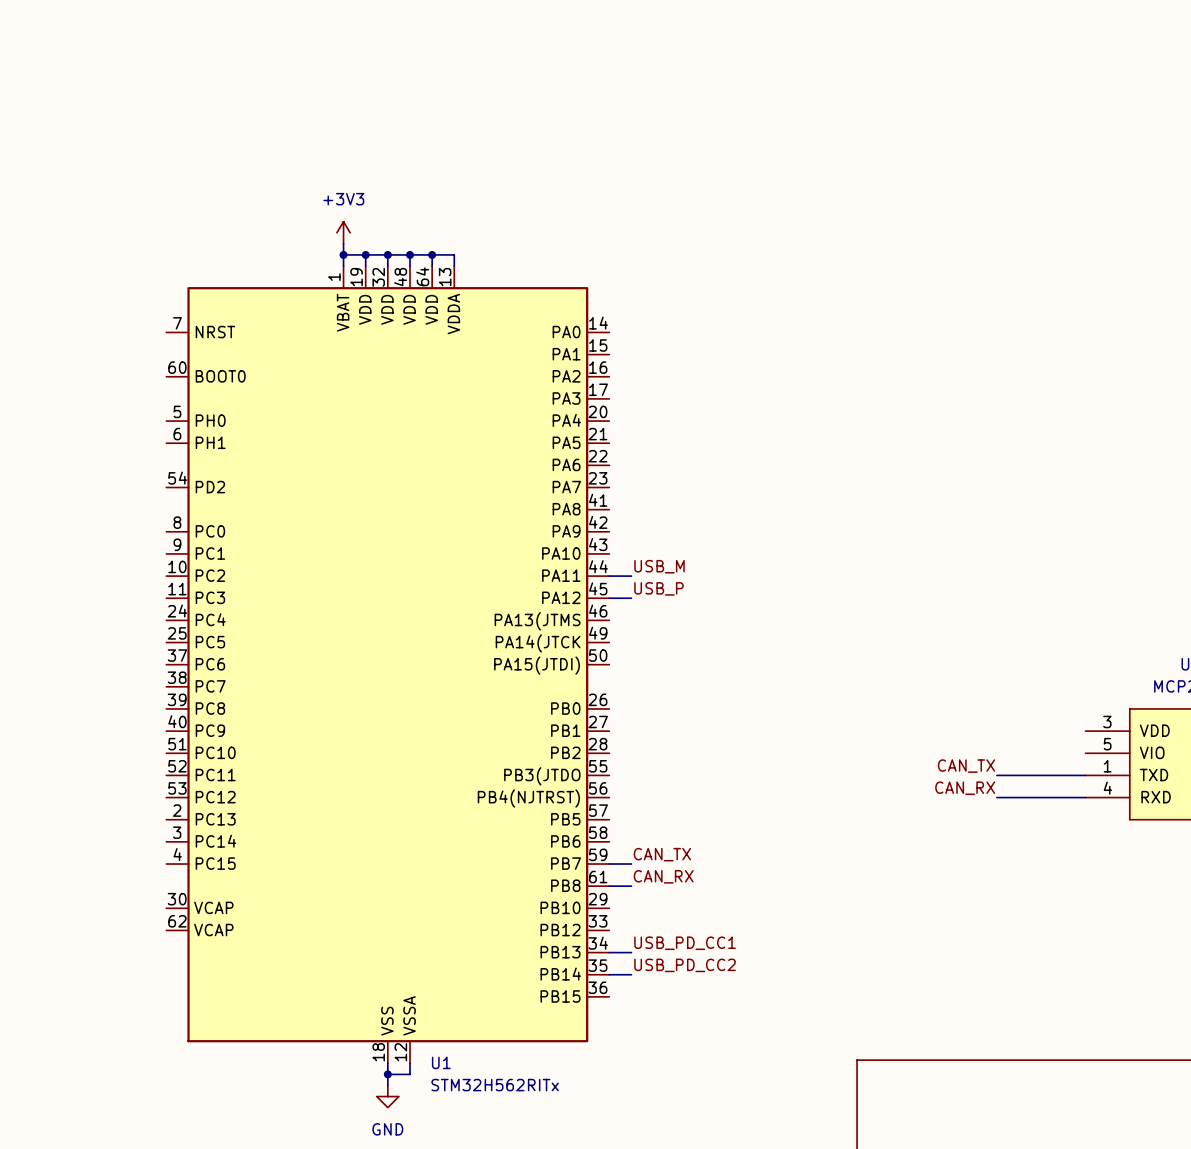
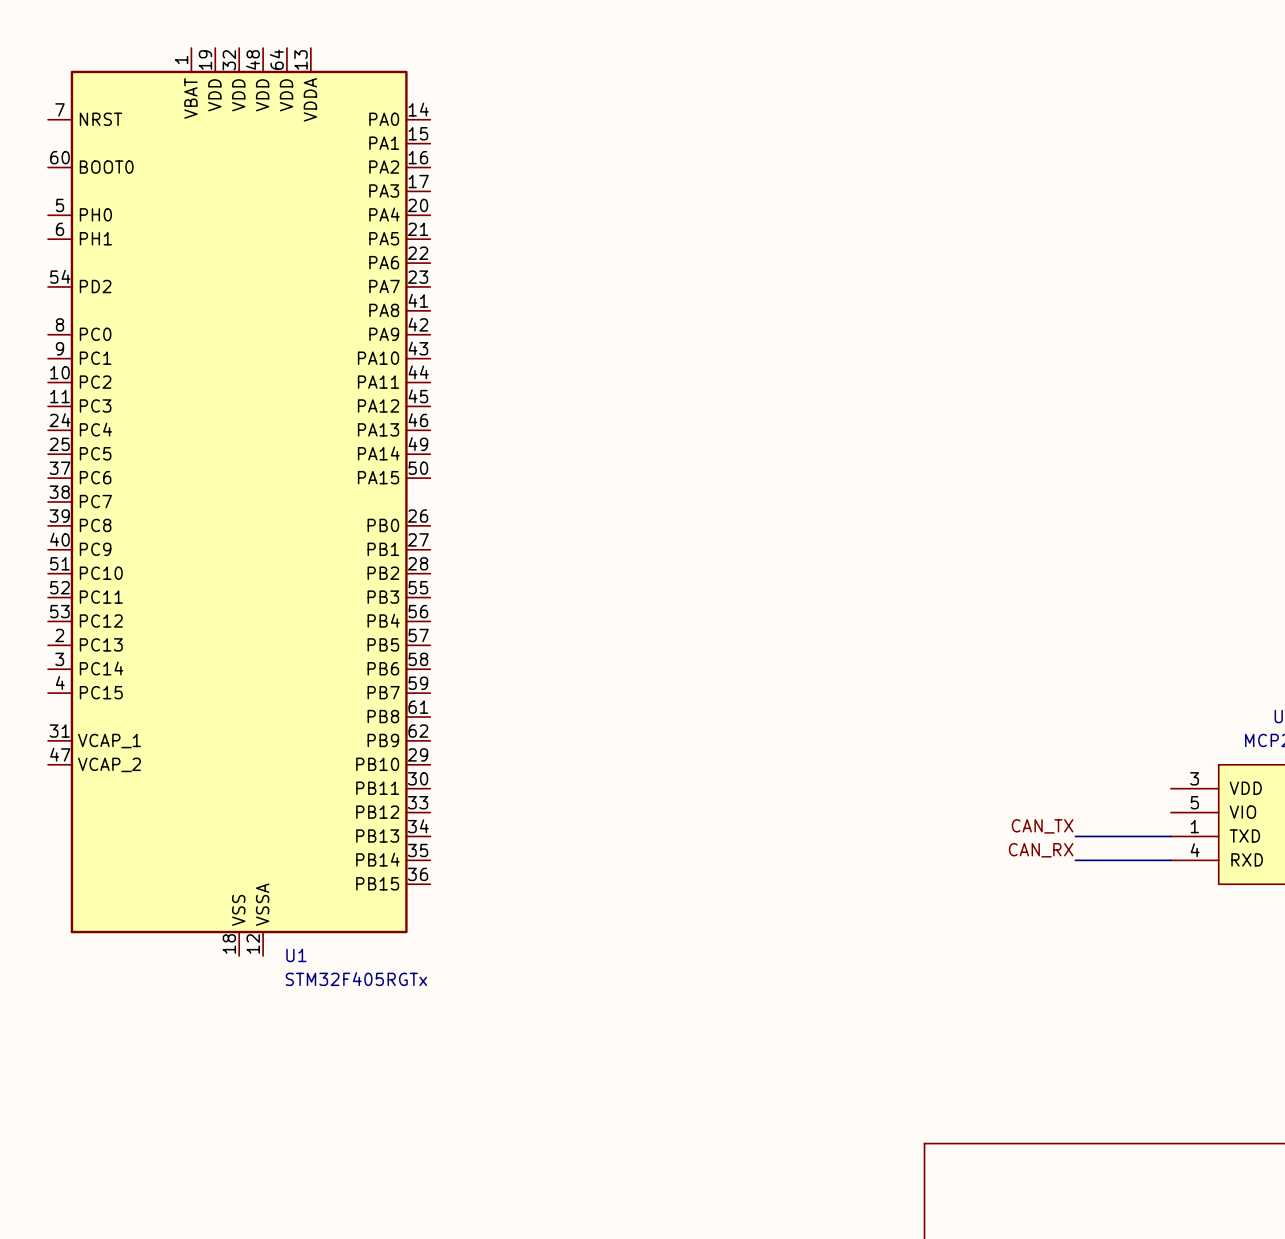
power symbol: +3V3 (343, 232) -> none
wire: (343, 254) (454, 254) (454, 266) -> none
junction: (343, 254) -> none
junction: (365, 254) -> none
wire: (387, 254) (387, 266) -> none
junction: (387, 254) -> none
wire: (409, 254) (409, 266) -> none
junction: (409, 254) -> none
wire: (432, 254) (432, 266) -> none
junction: (432, 254) -> none
U1 symbol: [166, 266, 610, 1064] -> [48, 48, 431, 956]
label: USB_M (659, 566) -> none
wire: (609, 576) (631, 576) -> none
label: USB_P (658, 588) -> none
wire: (609, 598) (631, 598) -> none
label: CAN_TX (662, 854) -> none
wire: (609, 864) (631, 864) -> none
label: CAN_RX (663, 876) -> none
wire: (609, 886) (631, 886) -> none
label: USB_PD_CC1 (685, 943) -> none
wire: (609, 952) (631, 952) -> none
label: USB_PD_CC2 (685, 965) -> none
wire: (609, 974) (631, 974) -> none
U1 name position: U1 (441, 1062) -> U1 (296, 955)
wire: (387, 1063) (387, 1085) -> none
wire: (409, 1063) (409, 1074) (387, 1074) -> none
junction: (387, 1074) -> none
U1 value: STM32H562RITx (495, 1085) -> STM32F405RGTx (356, 979)
power symbol: GND (387, 1096) -> none

